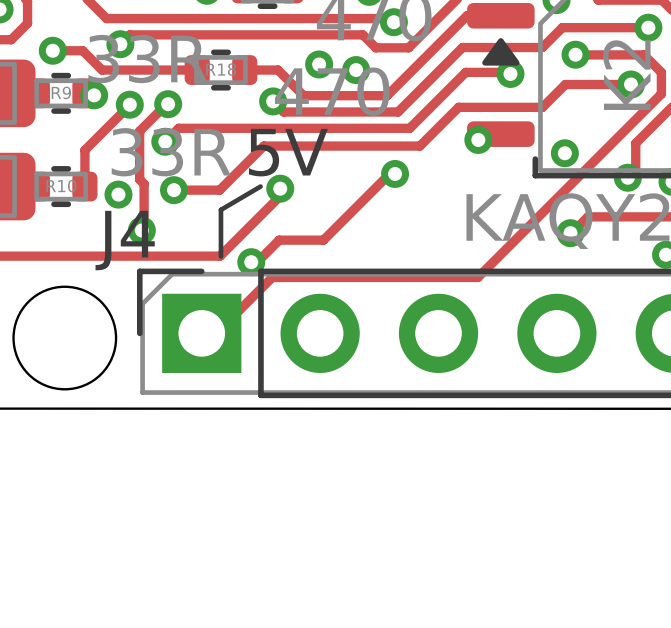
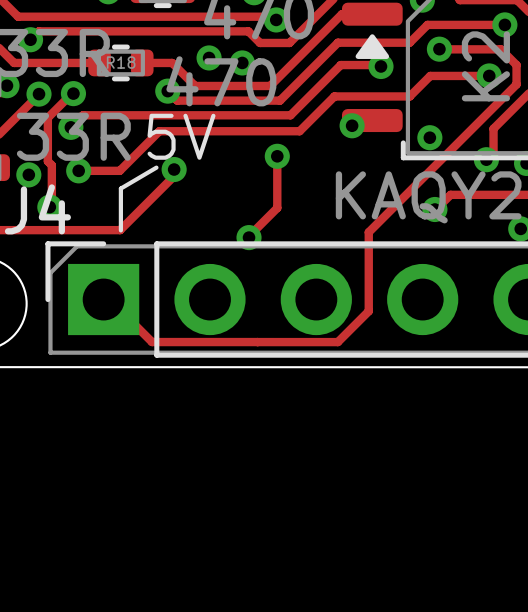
track: (395, 173) (389, 173) (323, 240) (279, 240) (256, 262) (251, 262) -> (277, 156) (277, 208) (249, 237)
track: (496, 258) (477, 277) (272, 277) (216, 333) (201, 333) -> (368, 232) (368, 311) (337, 342) (152, 342) (102, 292)
via position: (251, 262) -> (249, 237)

